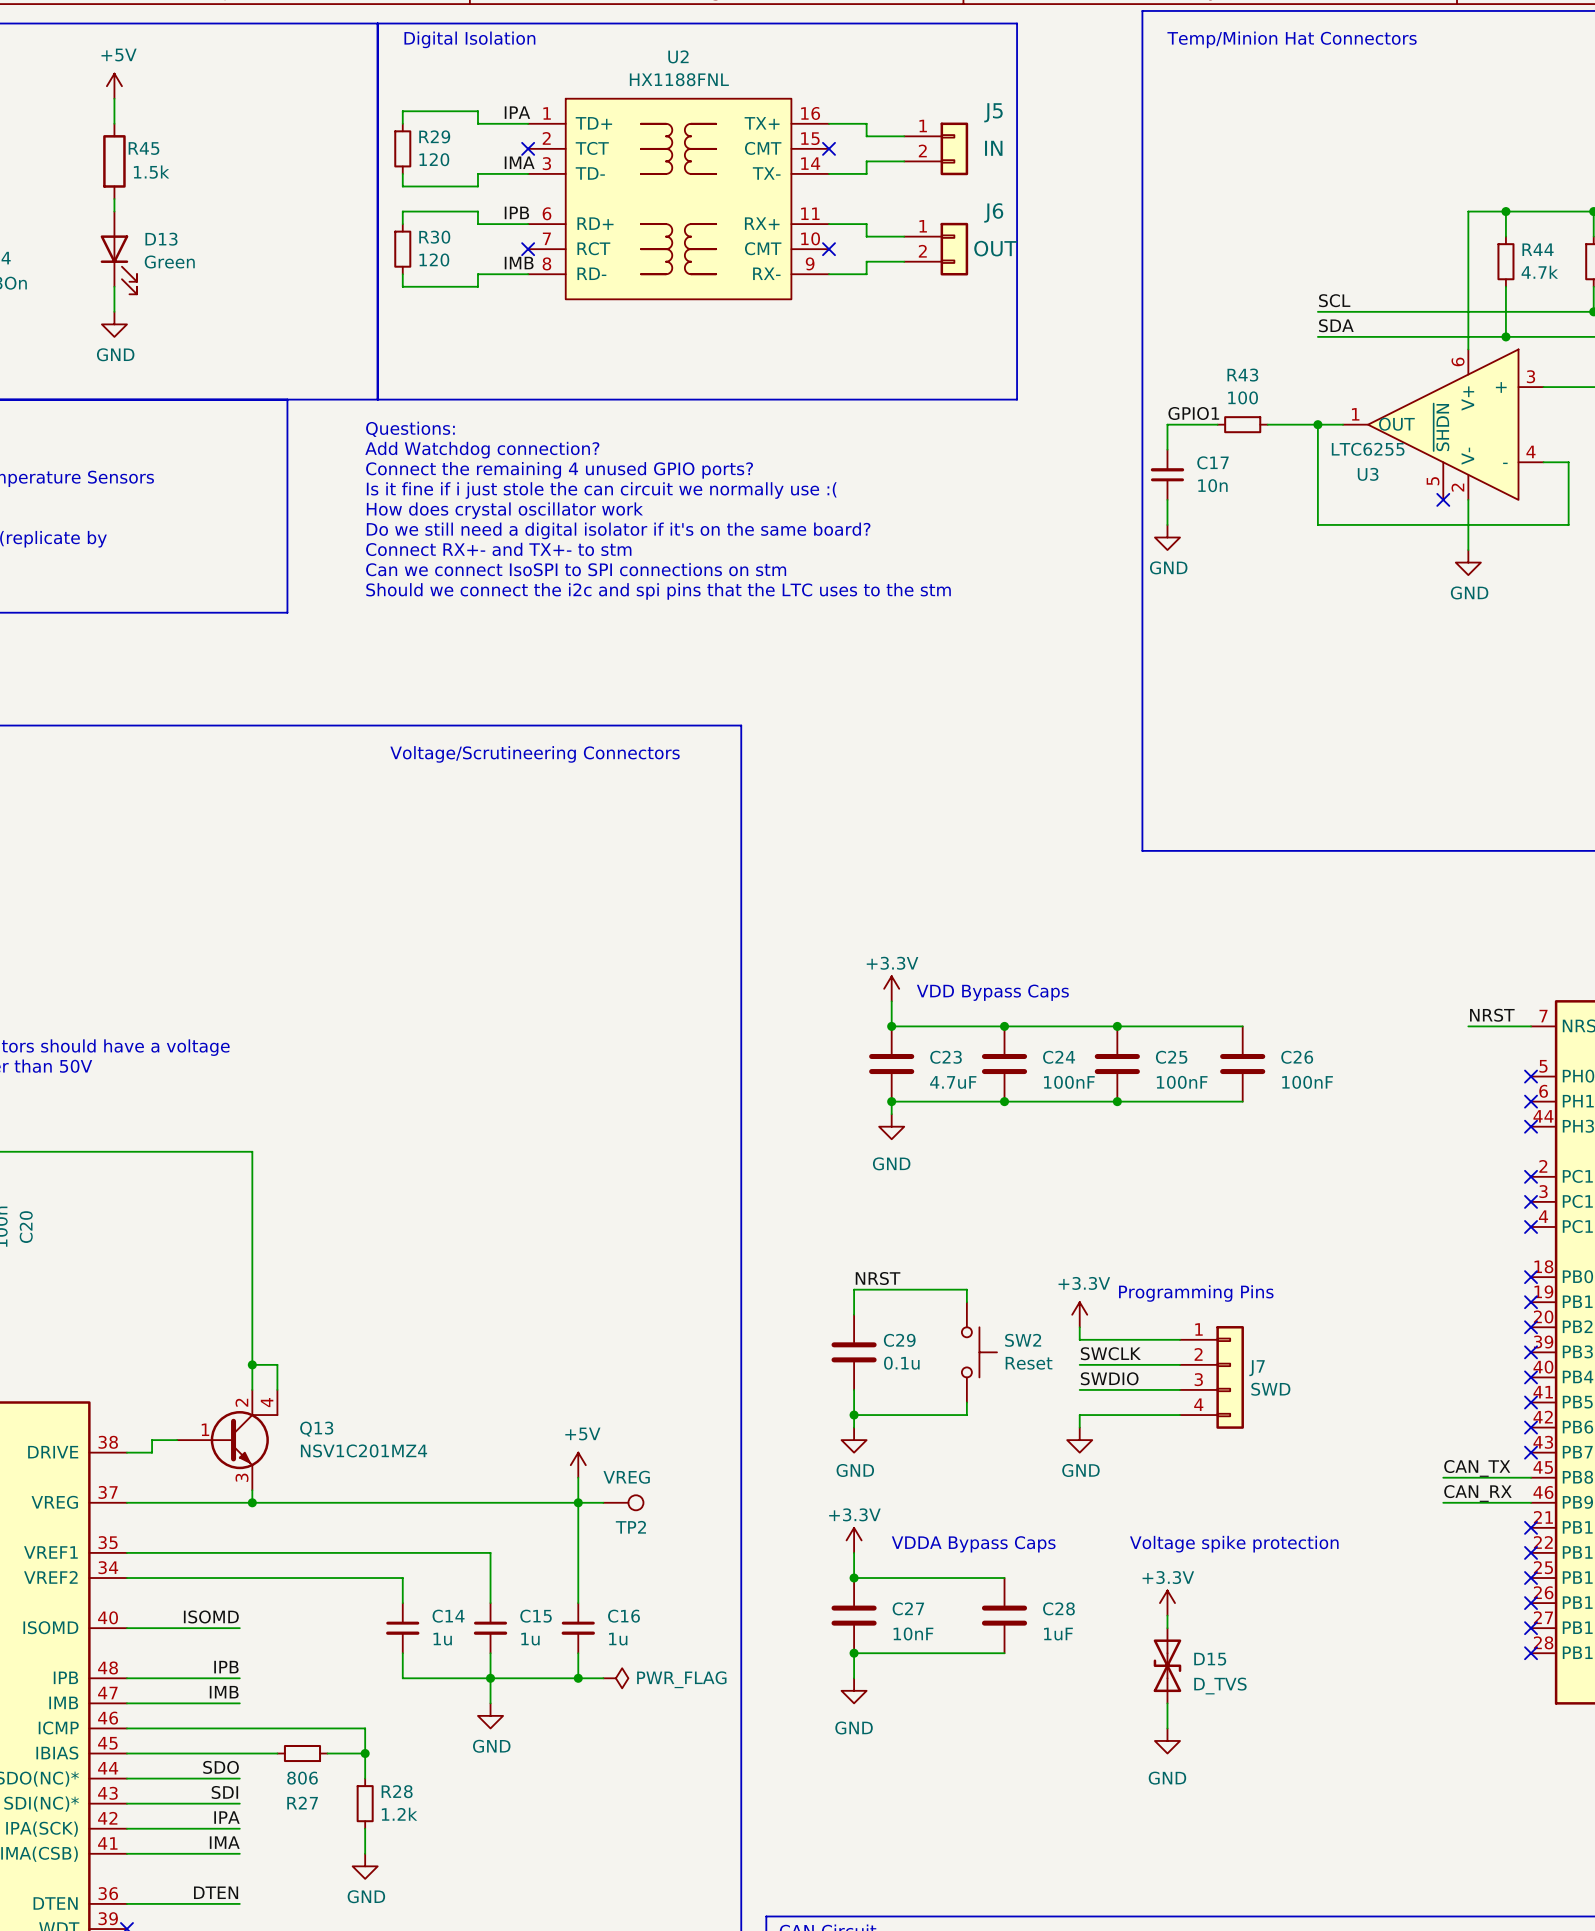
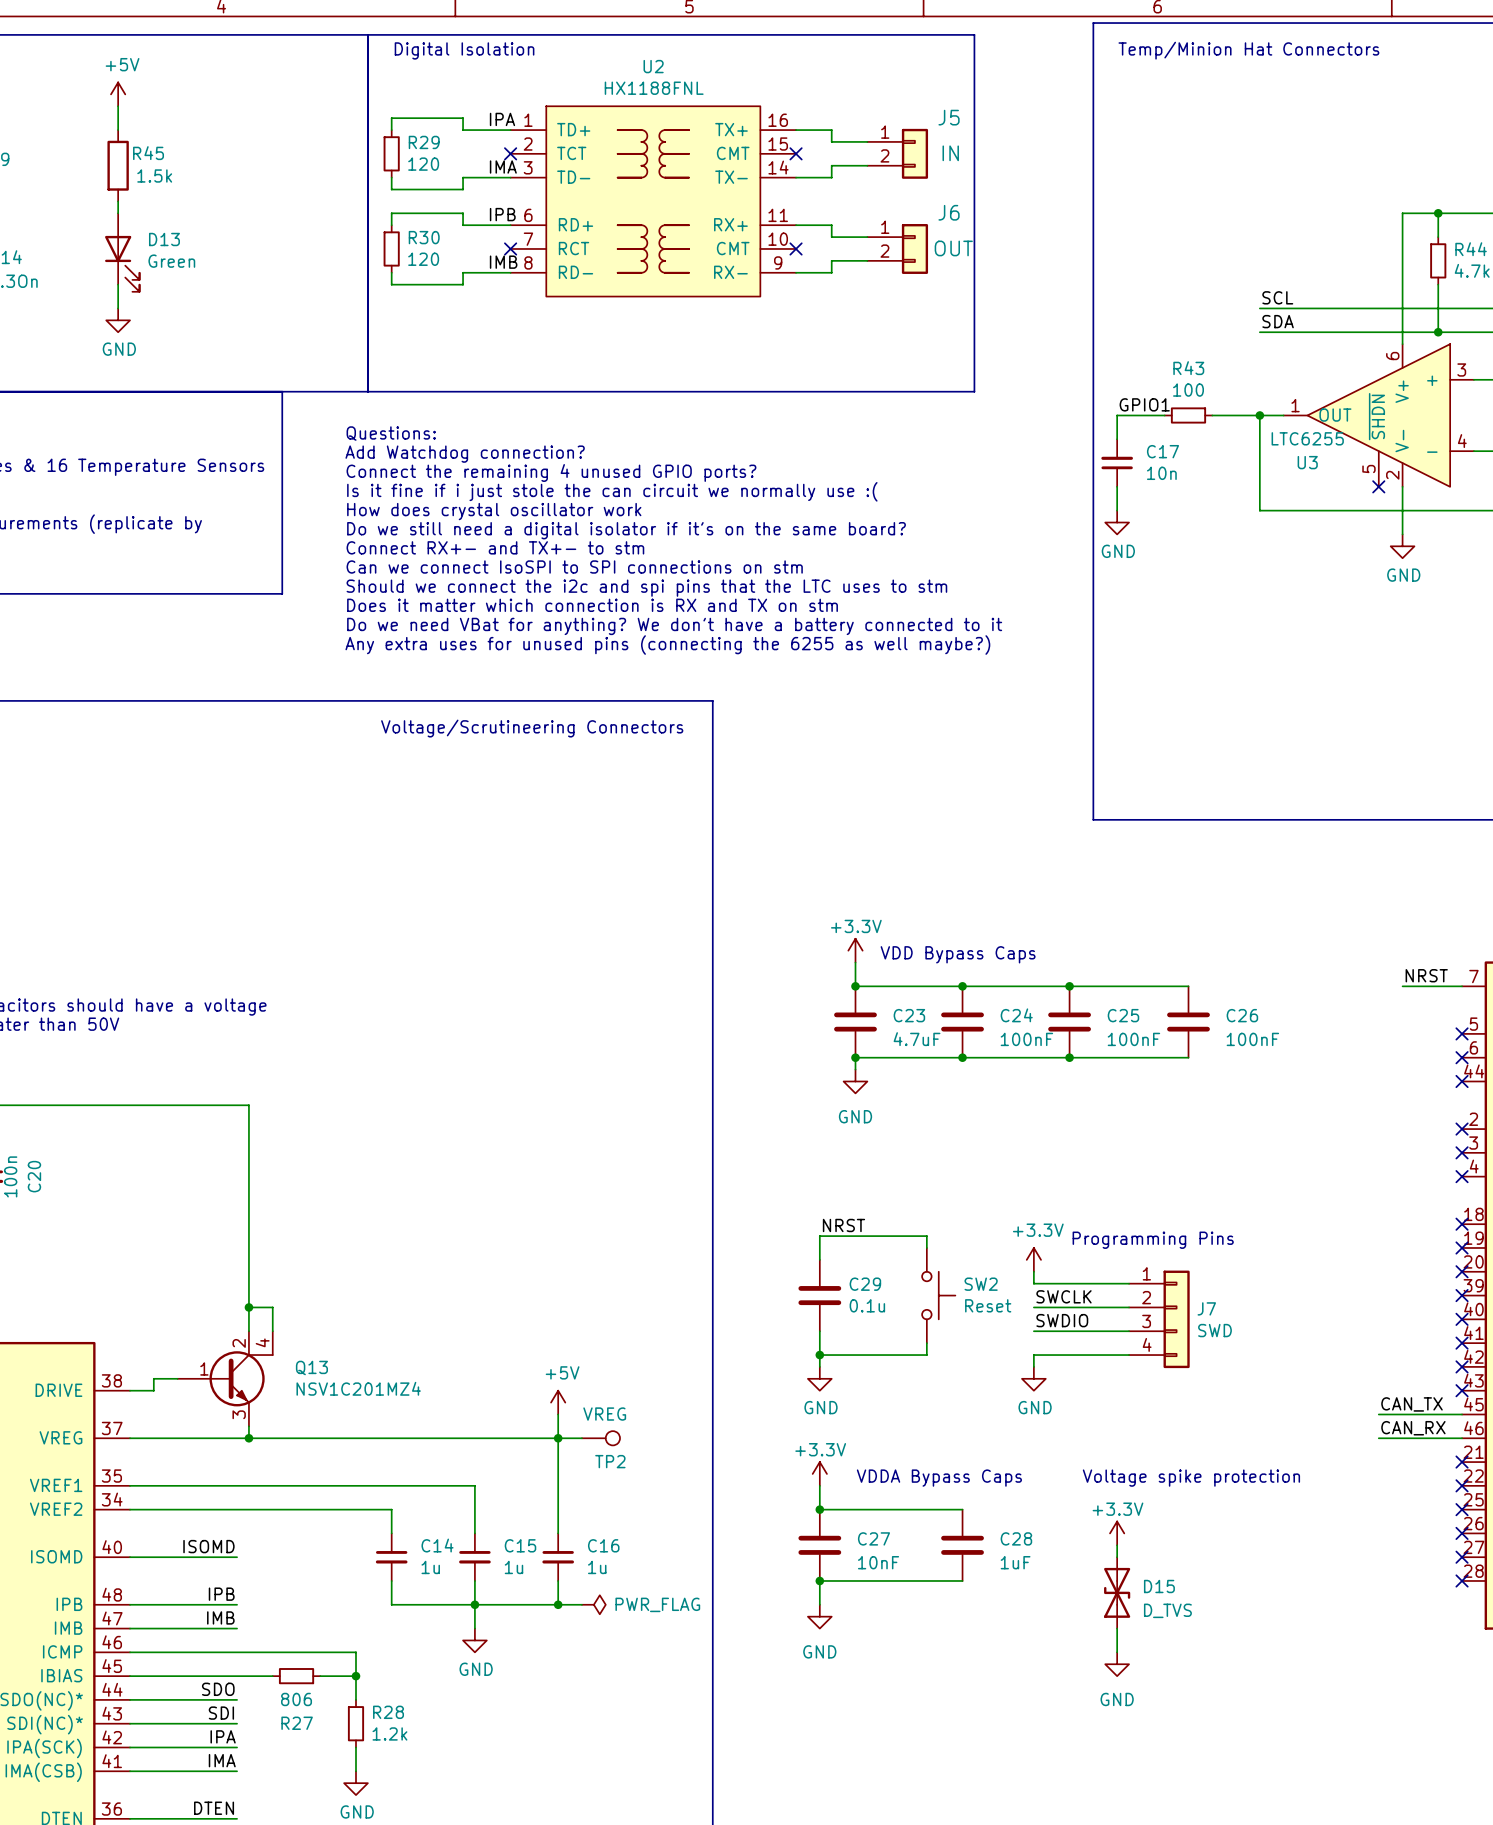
text position: Questions: (410, 429) -> Questions: (391, 433)
text position: Add Watchdog connection? (482, 450) -> Add Watchdog connection? (465, 454)
text position: Connect the remaining 4 unused GPIO ports? (559, 470) -> Connect the remaining 4 unused GPIO ports? (551, 472)
text position: Is it fine if i just stole the can circuit we normally use :( (601, 490) -> Is it fine if i just stole the can circuit we normally use :( (612, 491)
text position: How does crystal oscillator work (504, 510) -> How does crystal oscillator work (494, 511)
text position: Do we still need a digital isolator if it's on the same board? (618, 530) -> Do we still need a digital isolator if it's on the same board? (626, 530)
text position: Connect RX+- and TX+- to stm (498, 549) -> Connect RX+- and TX+- to stm (495, 547)
text position: Can we connect IsoSPI to SPI connections on stm (576, 569) -> Can we connect IsoSPI to SPI connections on stm (574, 567)
text: Should we connect the i2c and spi pins that the LTC uses to the stm (658, 591) -> Should we connect the i2c and spi pins that the LTC uses to stm (646, 588)
text: none -> Does it matter which connection is RX and TX on stm (592, 605)
text: none -> Do we need VBat for anything? We don't have a battery connected to it (674, 626)
text: none -> Any extra uses for unused pins (connecting the 6255 as well maybe?) (667, 645)

